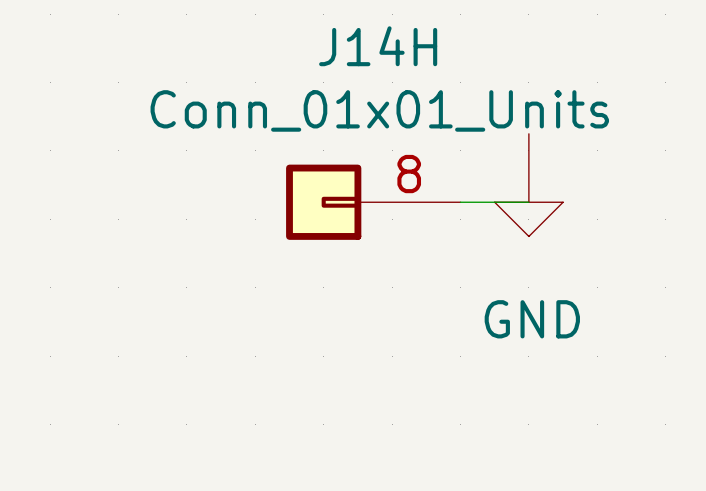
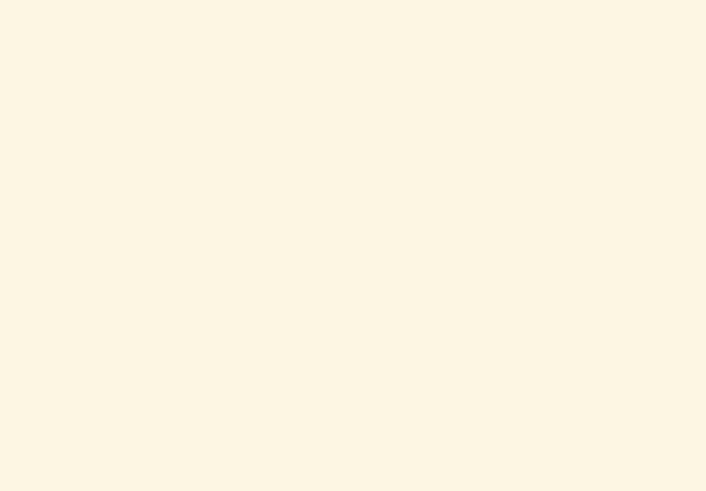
power symbol: GND (528, 185) -> none
J14H: Conn_01x01_Units (373, 202) -> none
wire: (460, 202) (528, 202) -> none

